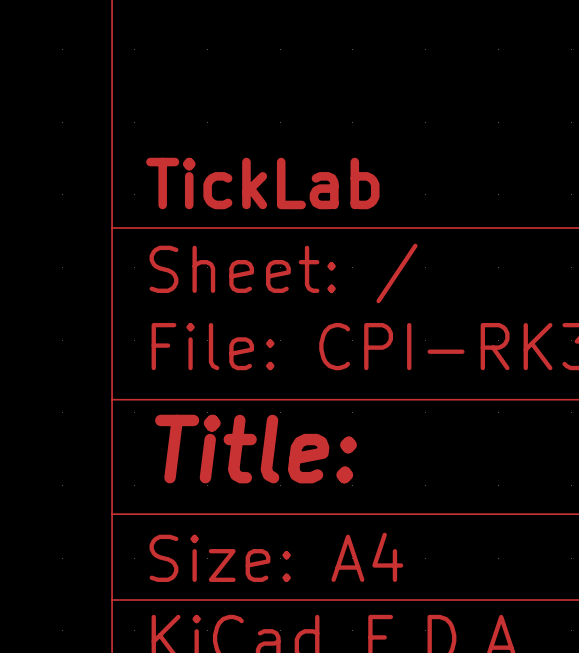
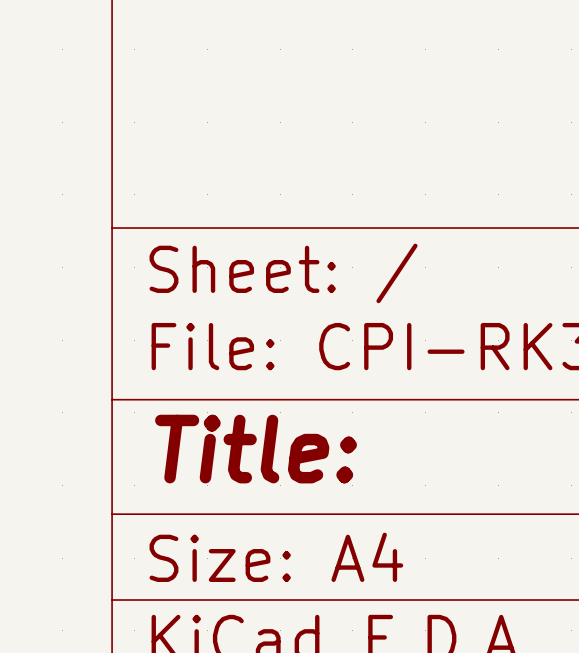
title block: TickLab (262, 183) -> none

